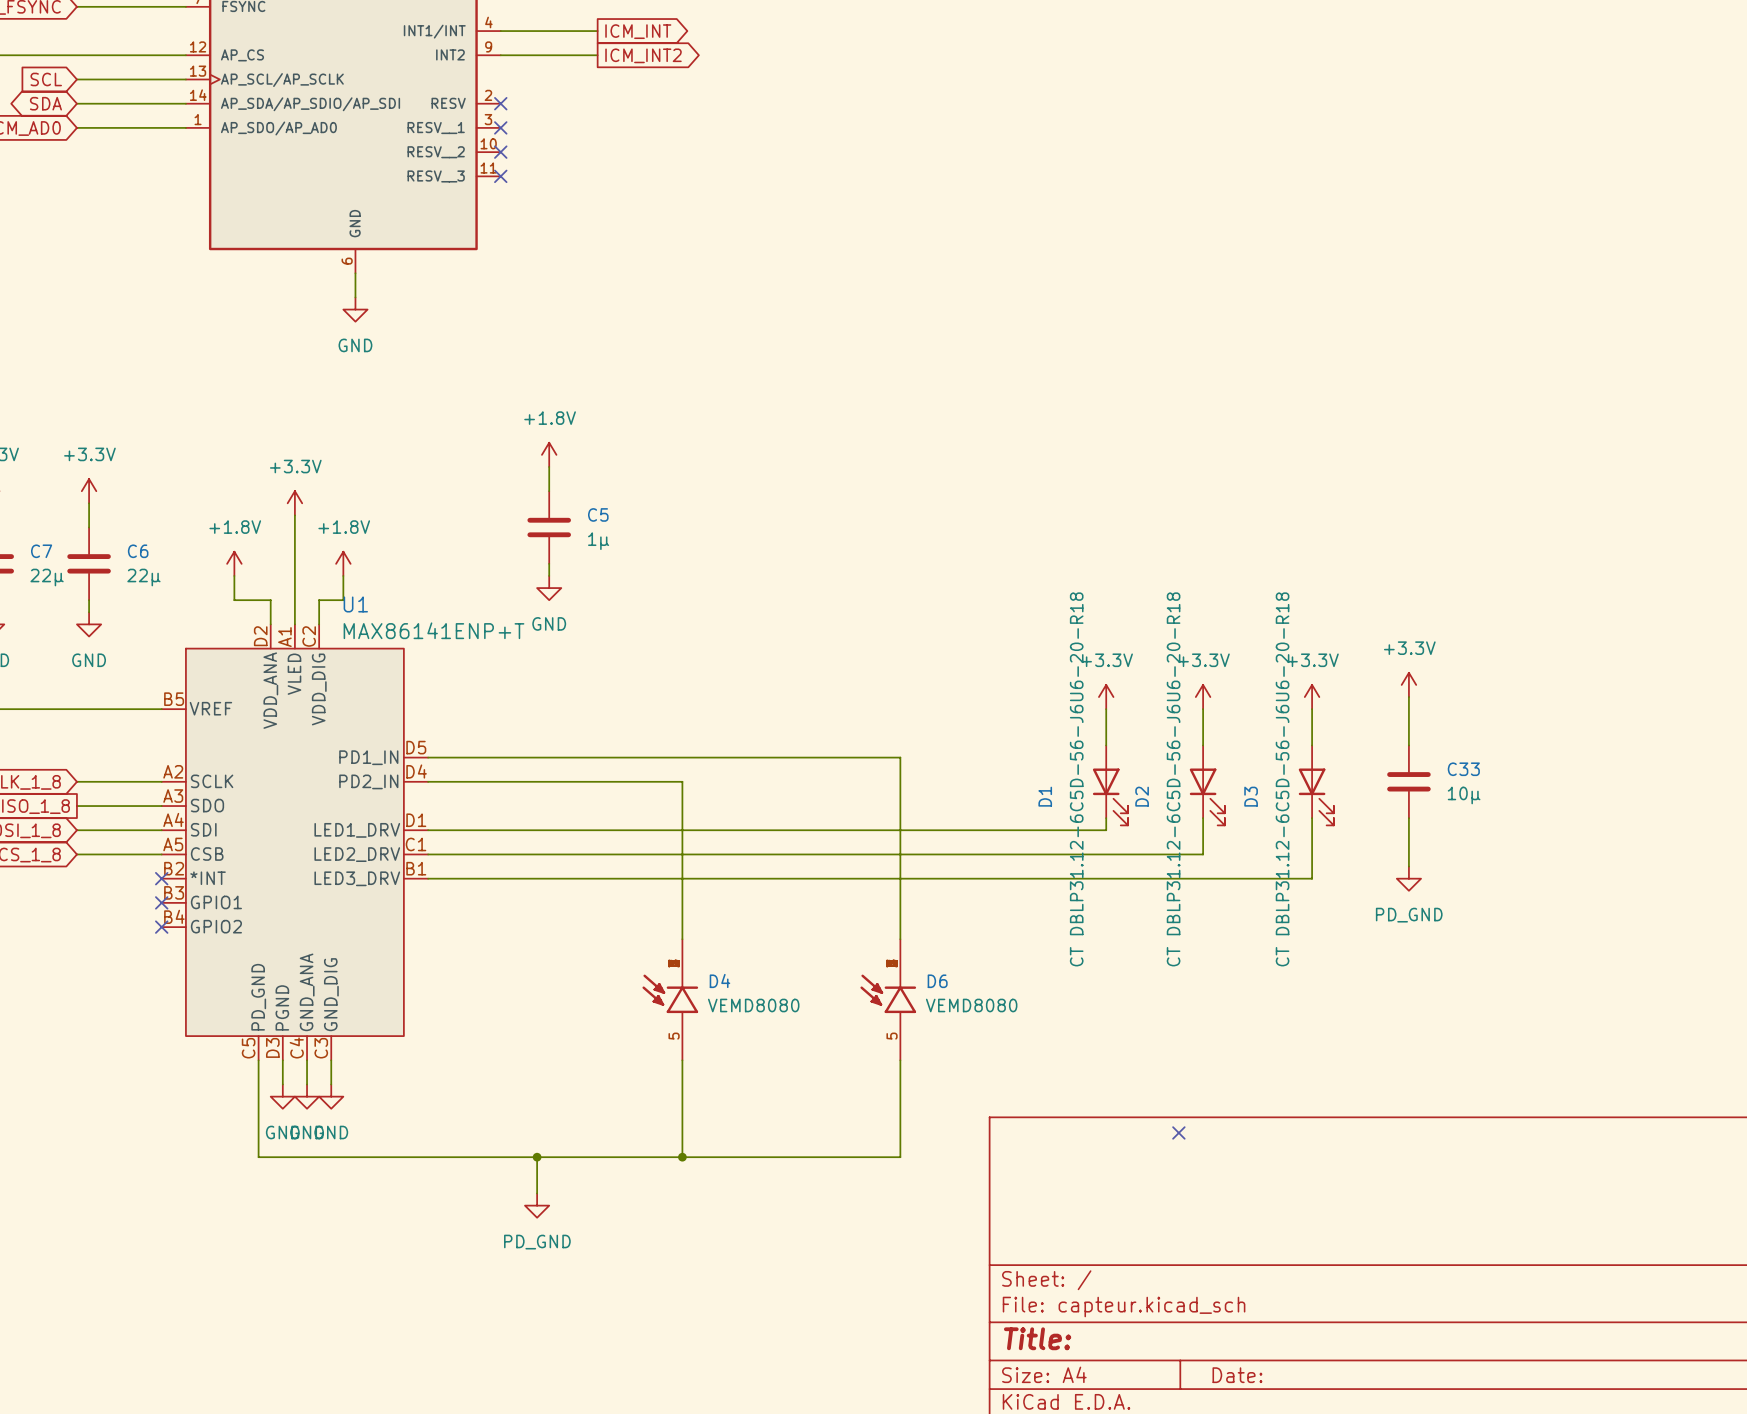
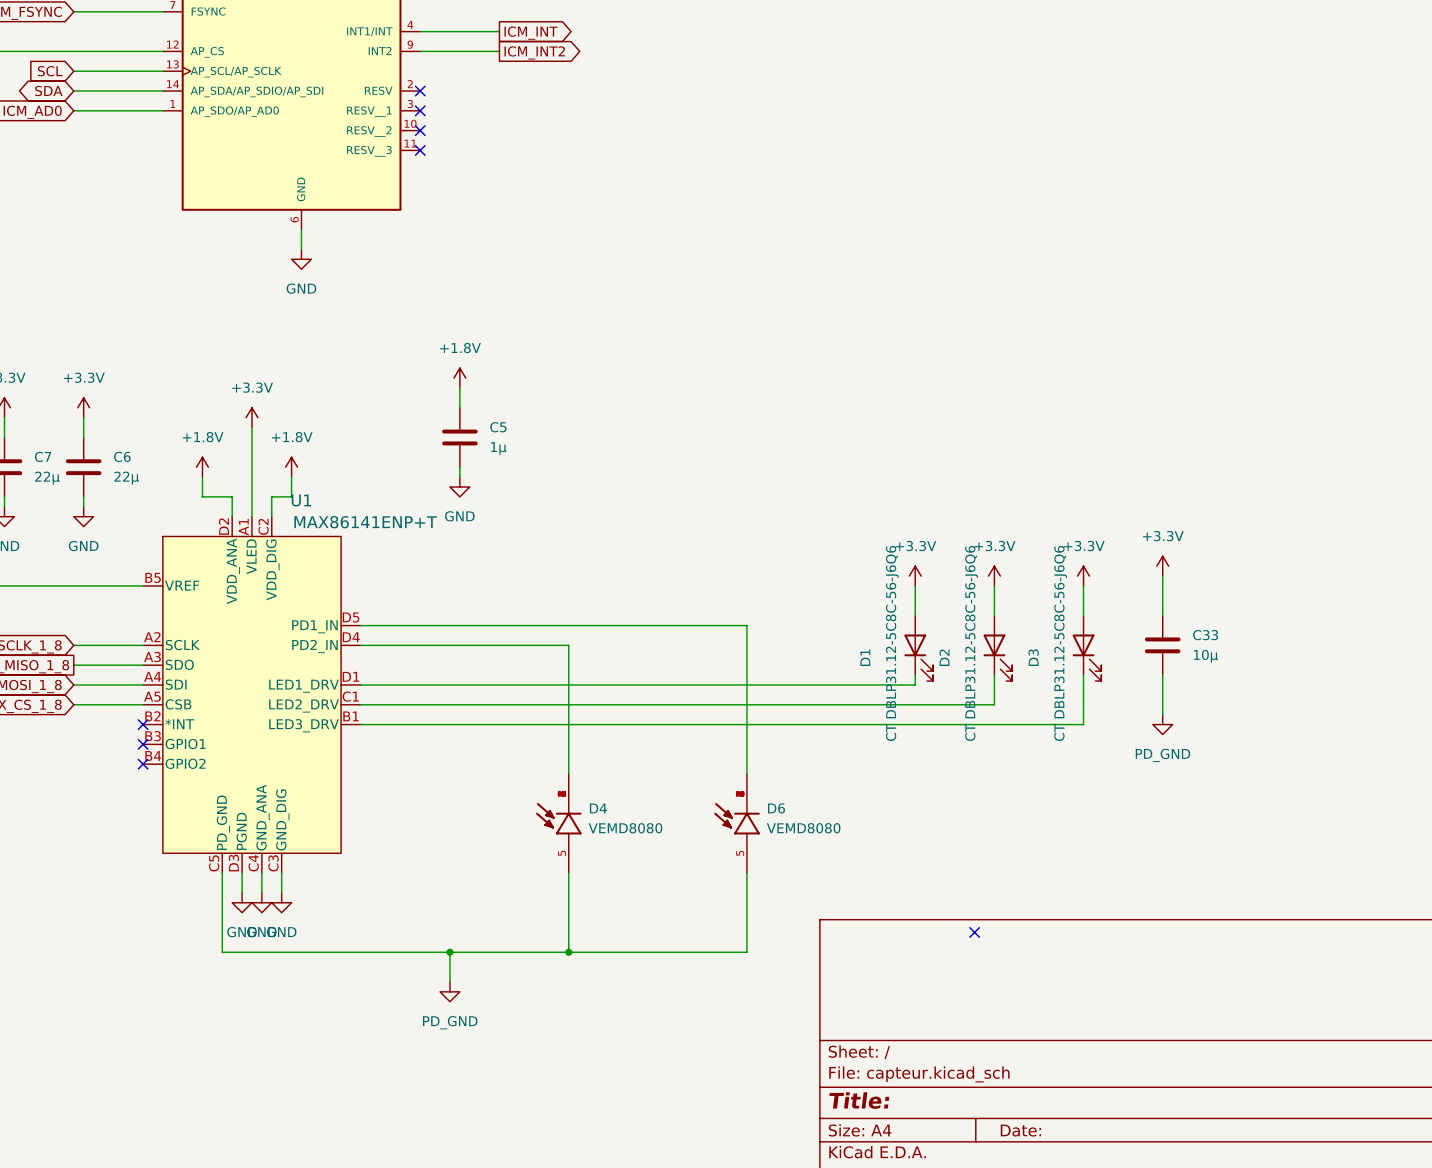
D1 value: CT DBLP31.12-6C5D-56-J6U6-20-R18 (1076, 779) -> CT DBLP31.12-5C8C-56-J6Q6 (892, 643)
D2 value: CT DBLP31.12-6C5D-56-J6U6-20-R18 (1173, 779) -> CT DBLP31.12-5C8C-56-J6Q6 (971, 643)
D3 value: CT DBLP31.12-6C5D-56-J6U6-20-R18 (1282, 779) -> CT DBLP31.12-5C8C-56-J6Q6 (1060, 643)

